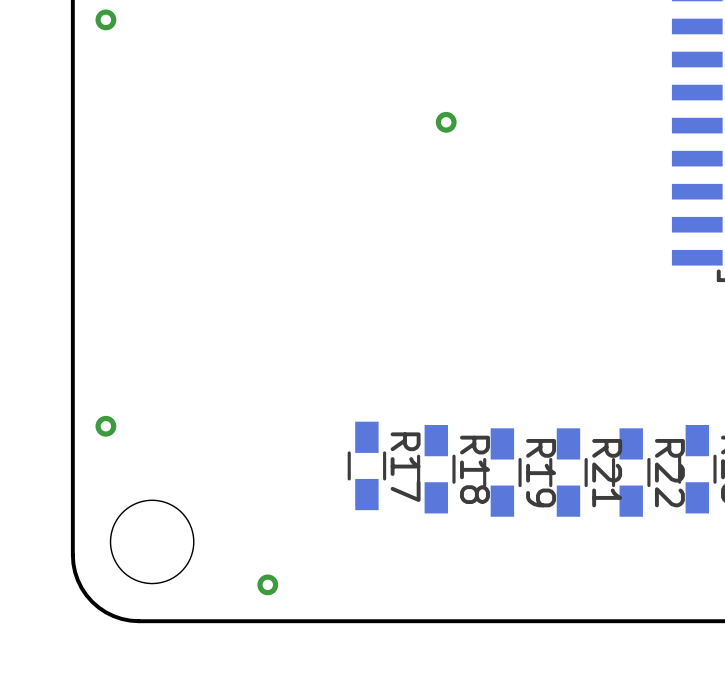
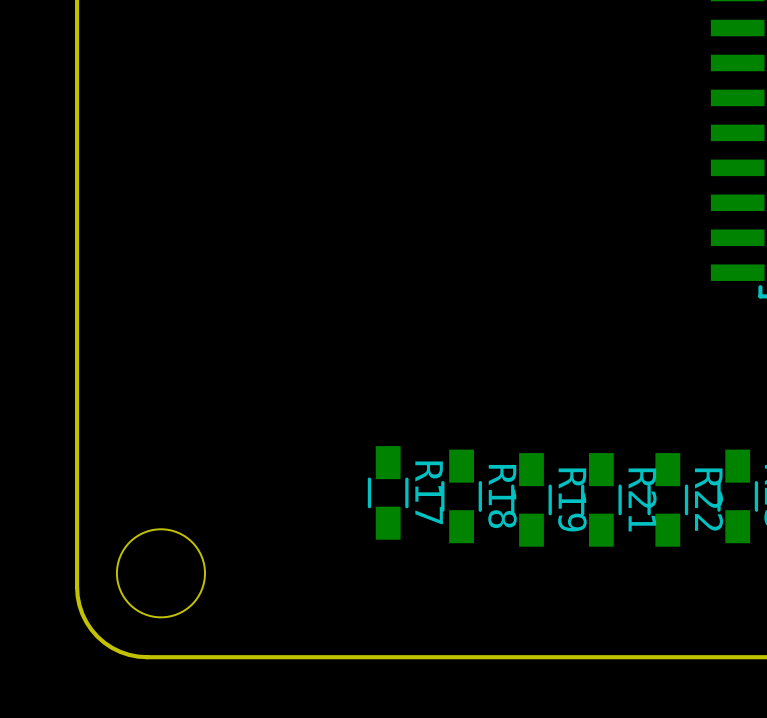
part: (105, 19) -> none
part: (446, 122) -> none
part: (105, 426) -> none
part: (267, 584) -> none

